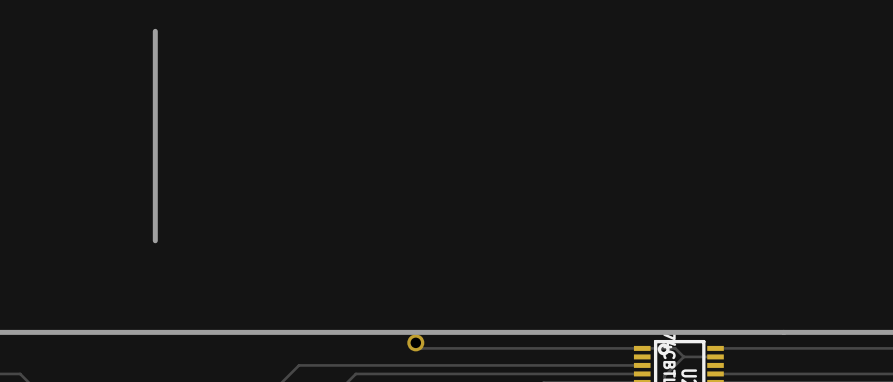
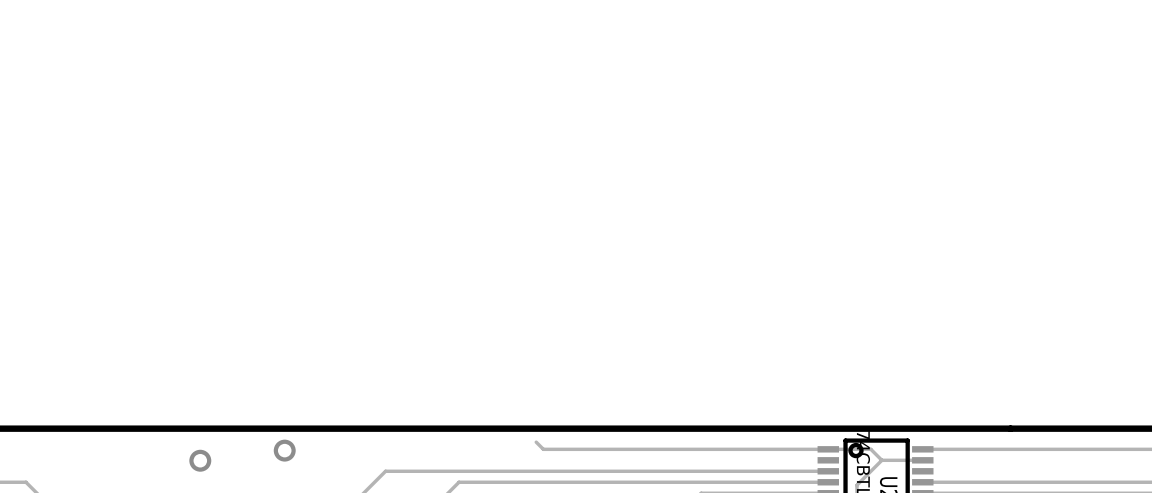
board edge: (155, 31) (155, 240) -> none
via: (415, 342) -> none
via: none -> (284, 450)
via: none -> (200, 460)

